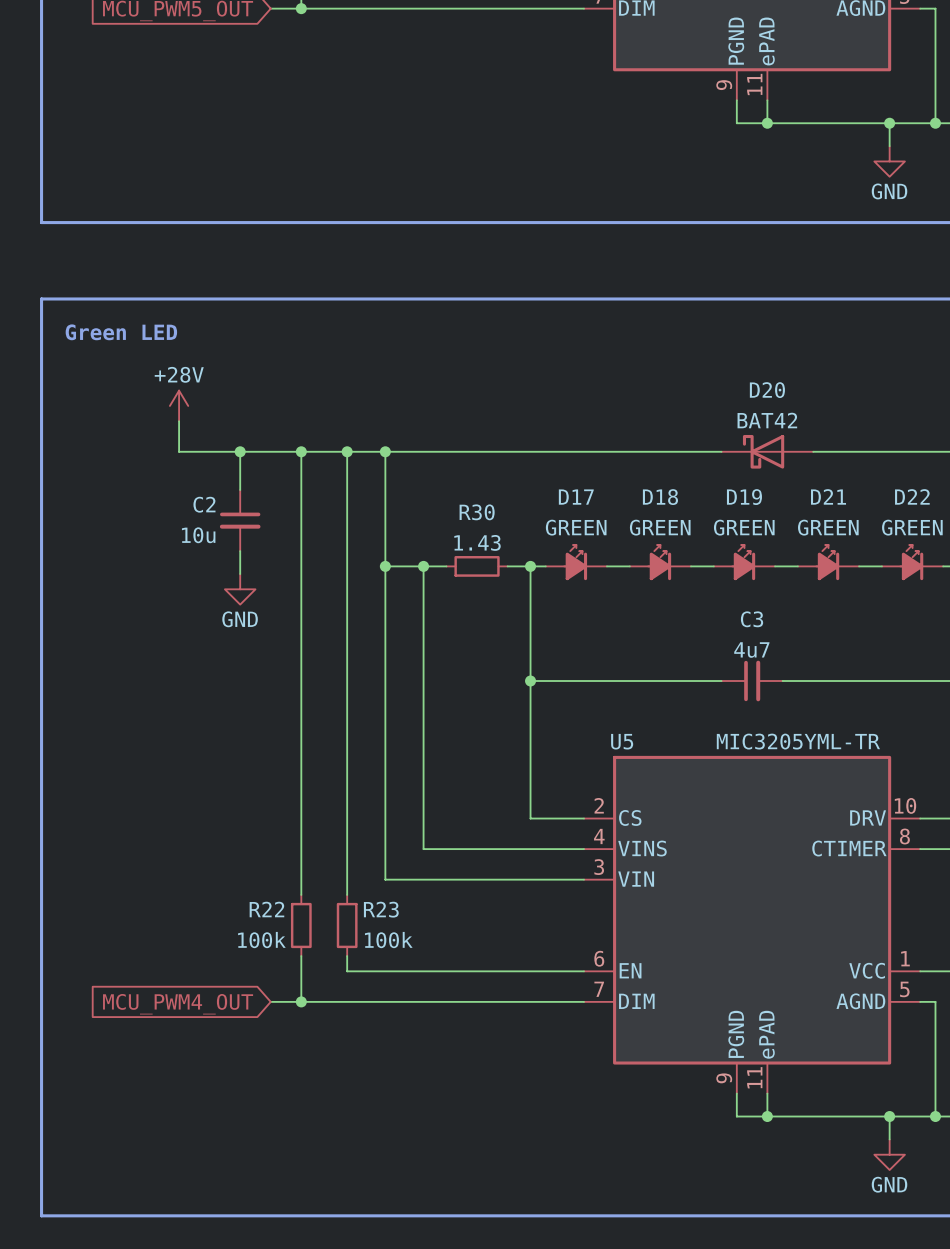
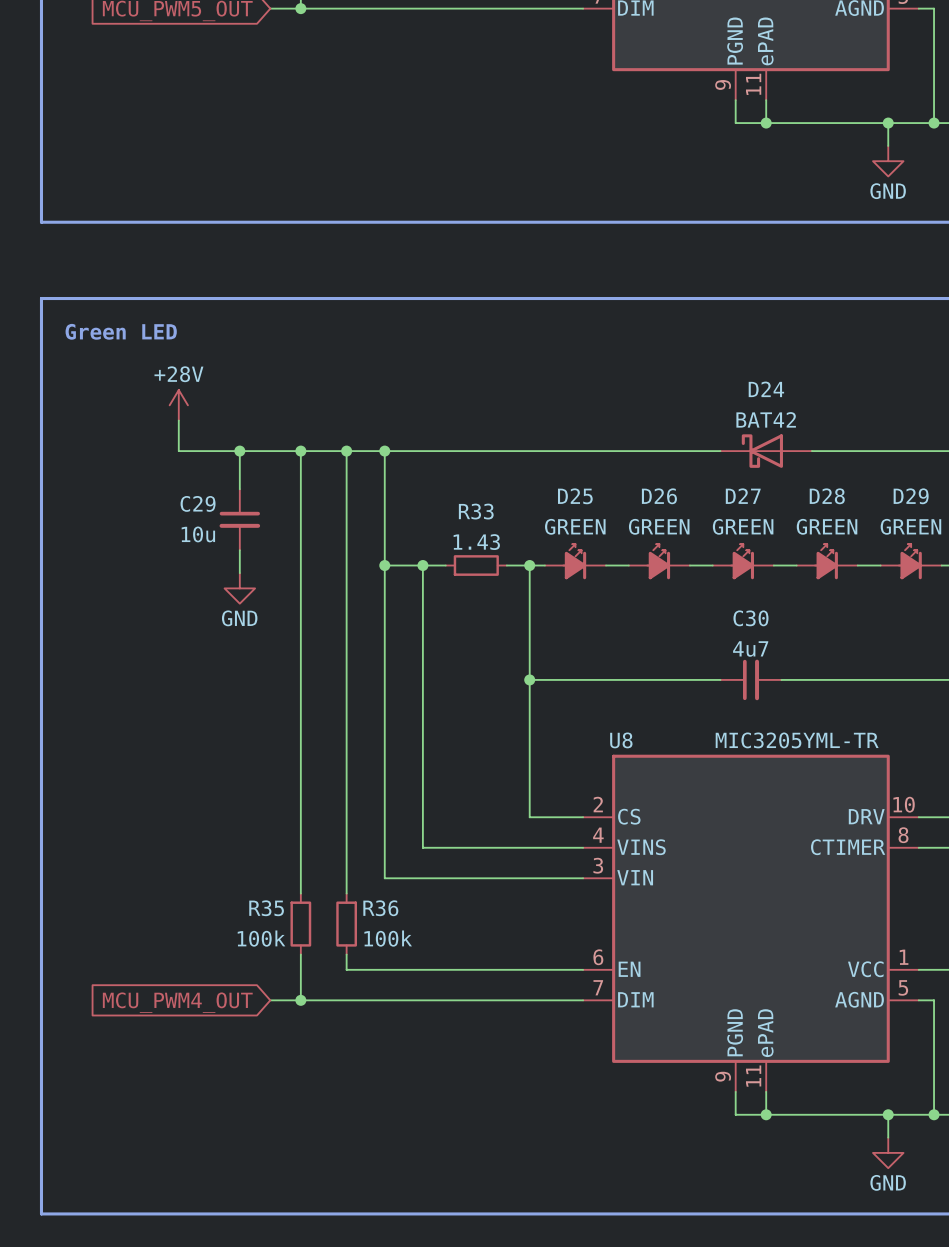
D20 name: D20 (767, 390) -> D24 (766, 389)
D21 name: D21 (828, 496) -> D28 (827, 496)
D22 name: D22 (912, 496) -> D29 (911, 496)
D17 name: D17 (576, 497) -> D25 (575, 496)
D18 name: D18 (660, 497) -> D26 (659, 496)
D19 name: D19 (744, 497) -> D27 (743, 496)
C2 name: C2 (204, 504) -> C29 (198, 503)
R30 name: R30 (477, 512) -> R33 (476, 511)
C3 name: C3 (752, 619) -> C30 (750, 618)
U5 name: U5 (622, 741) -> U8 (621, 740)
R22 name: R22 (266, 909) -> R35 (266, 908)
R23 name: R23 (381, 909) -> R36 (380, 908)

